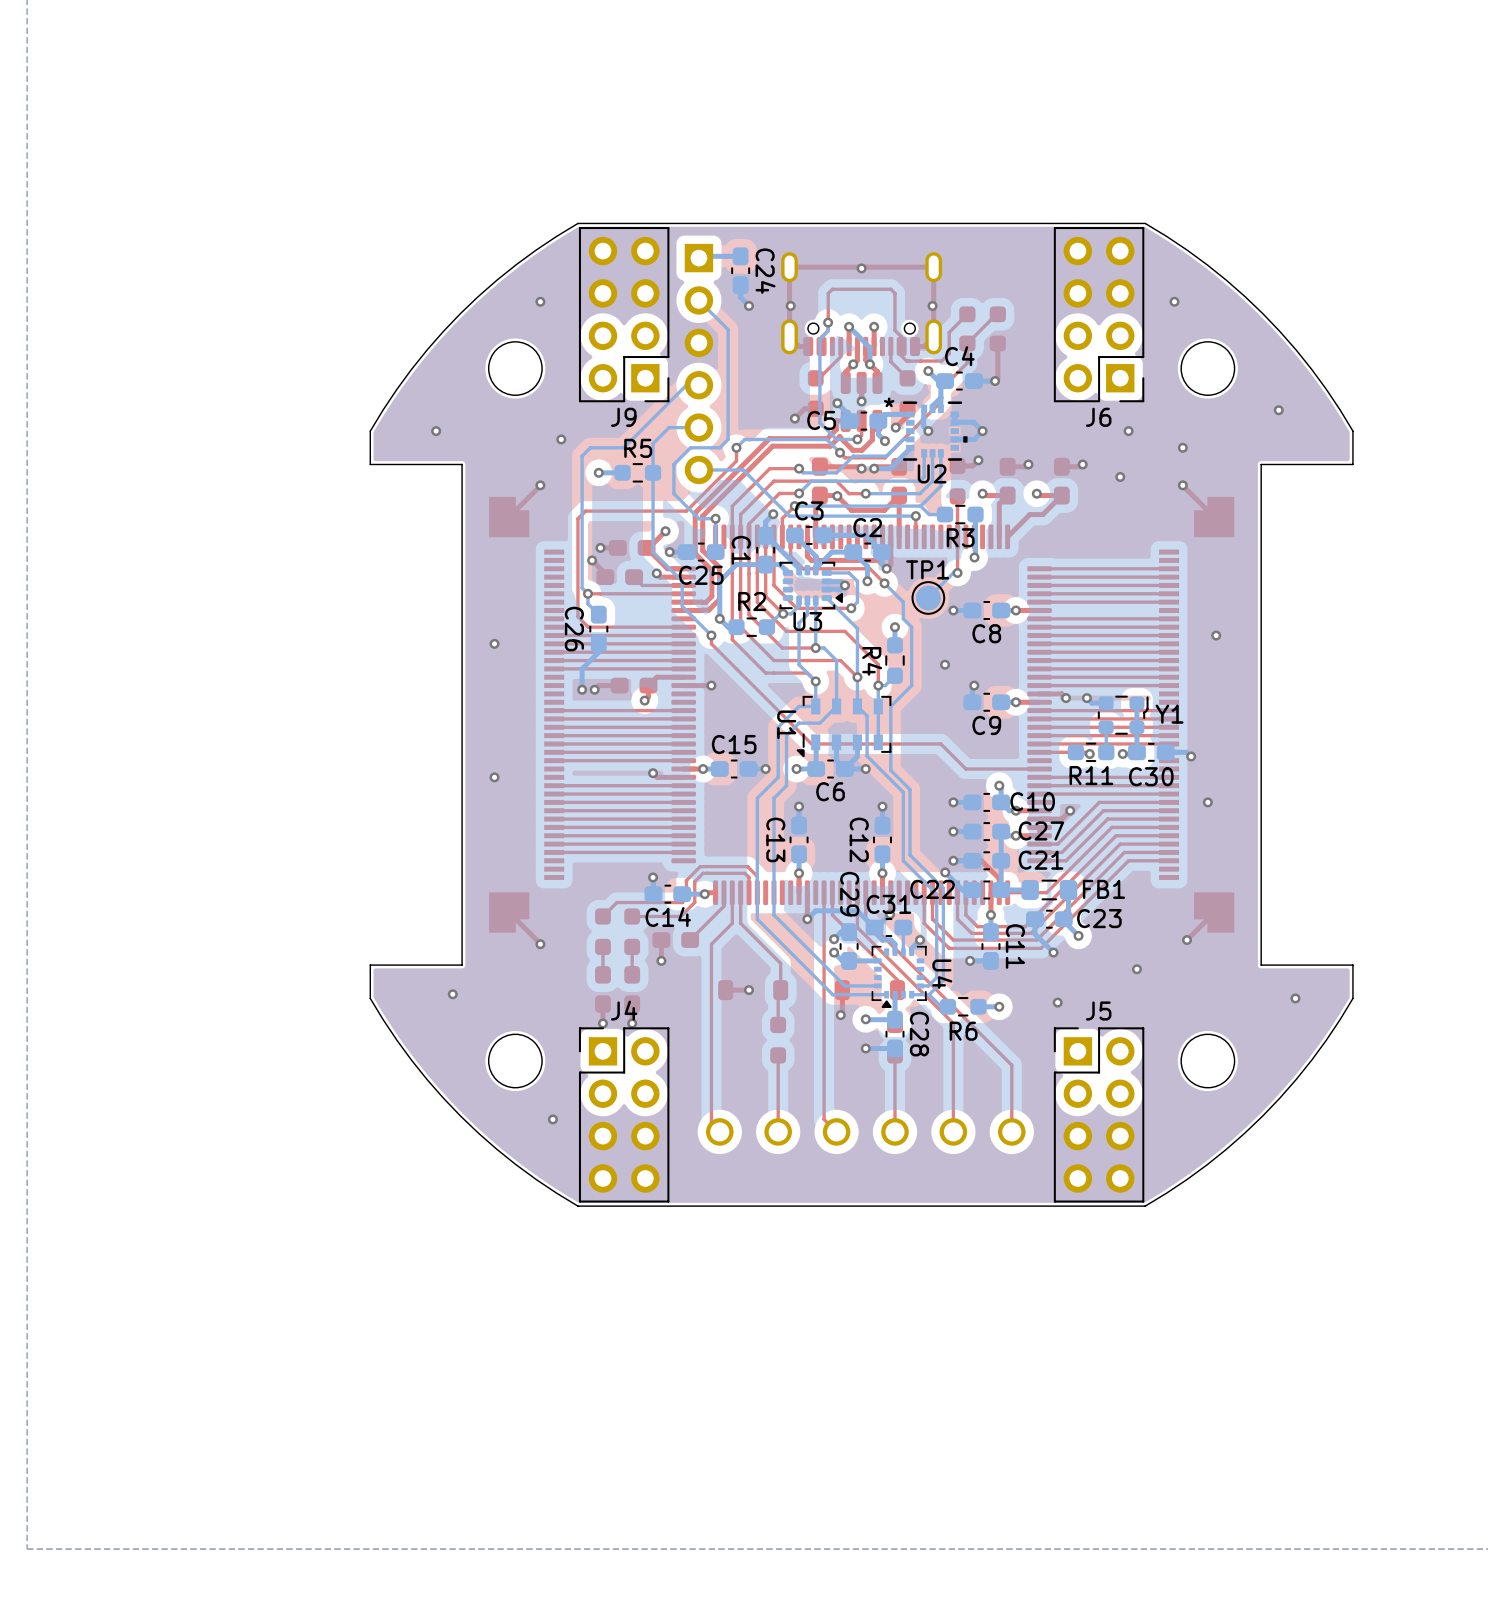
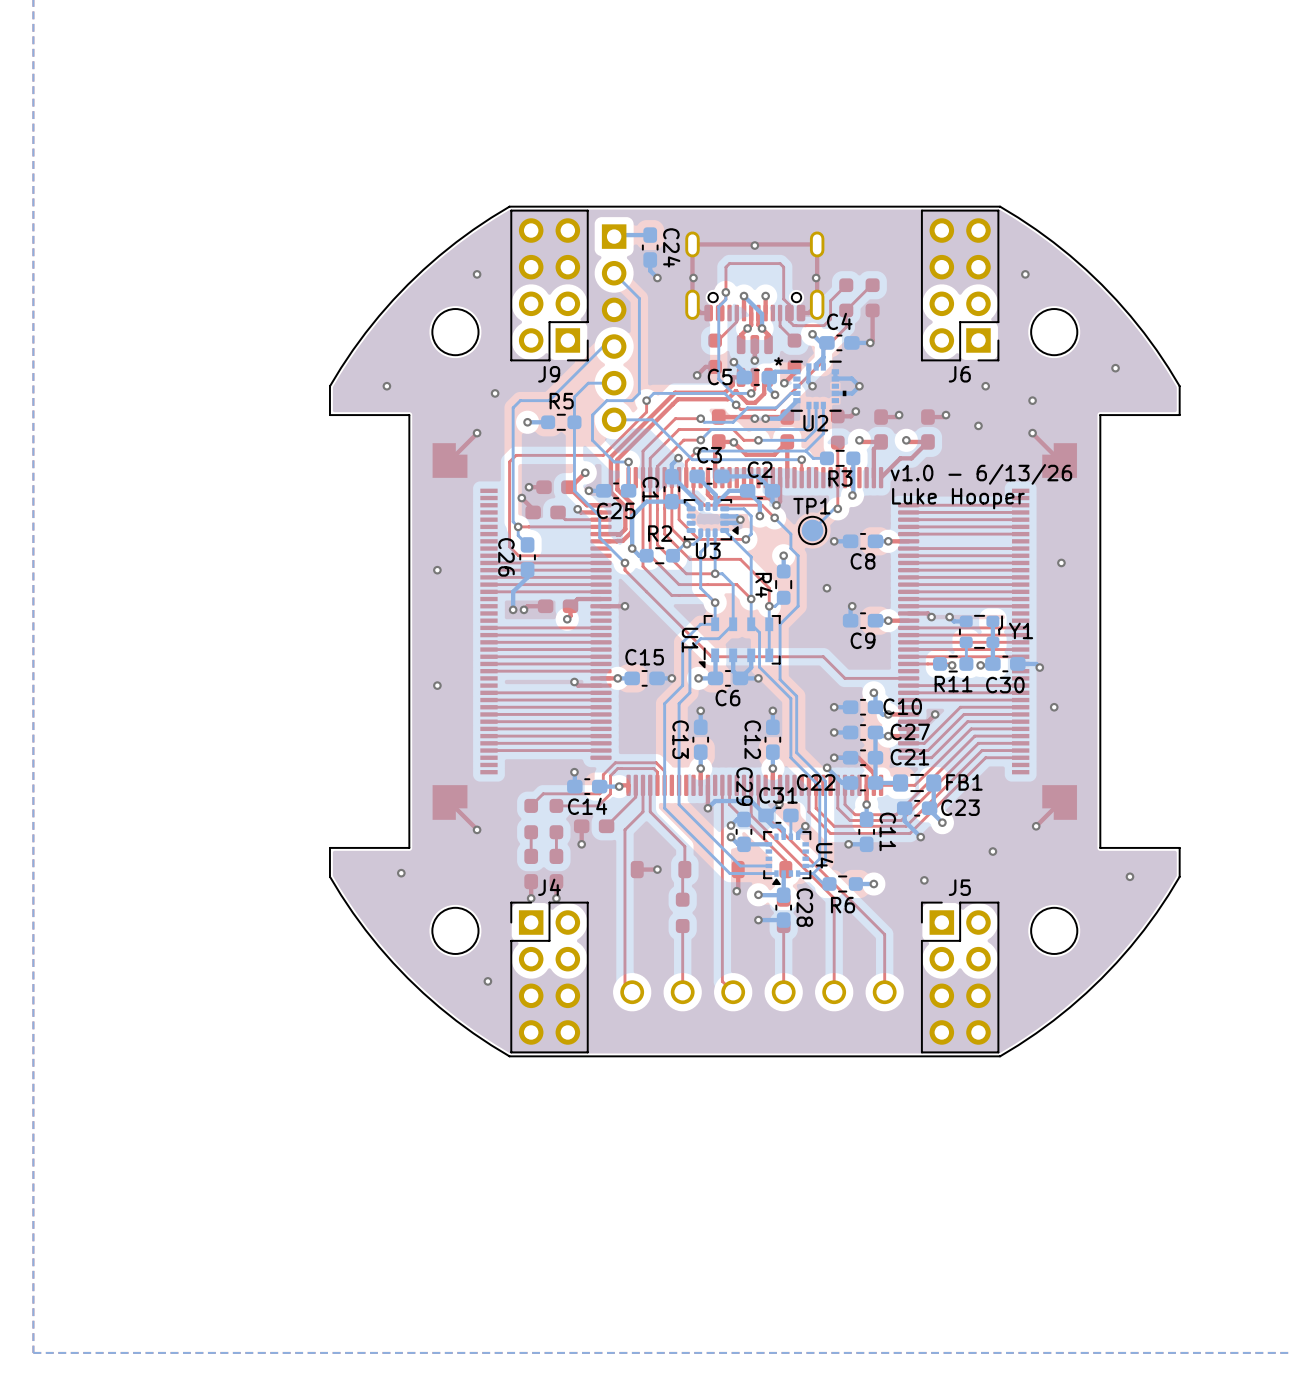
text: none -> v1.0 - 6/13/26 (981, 474)
text: none -> Luke Hooper (958, 498)

